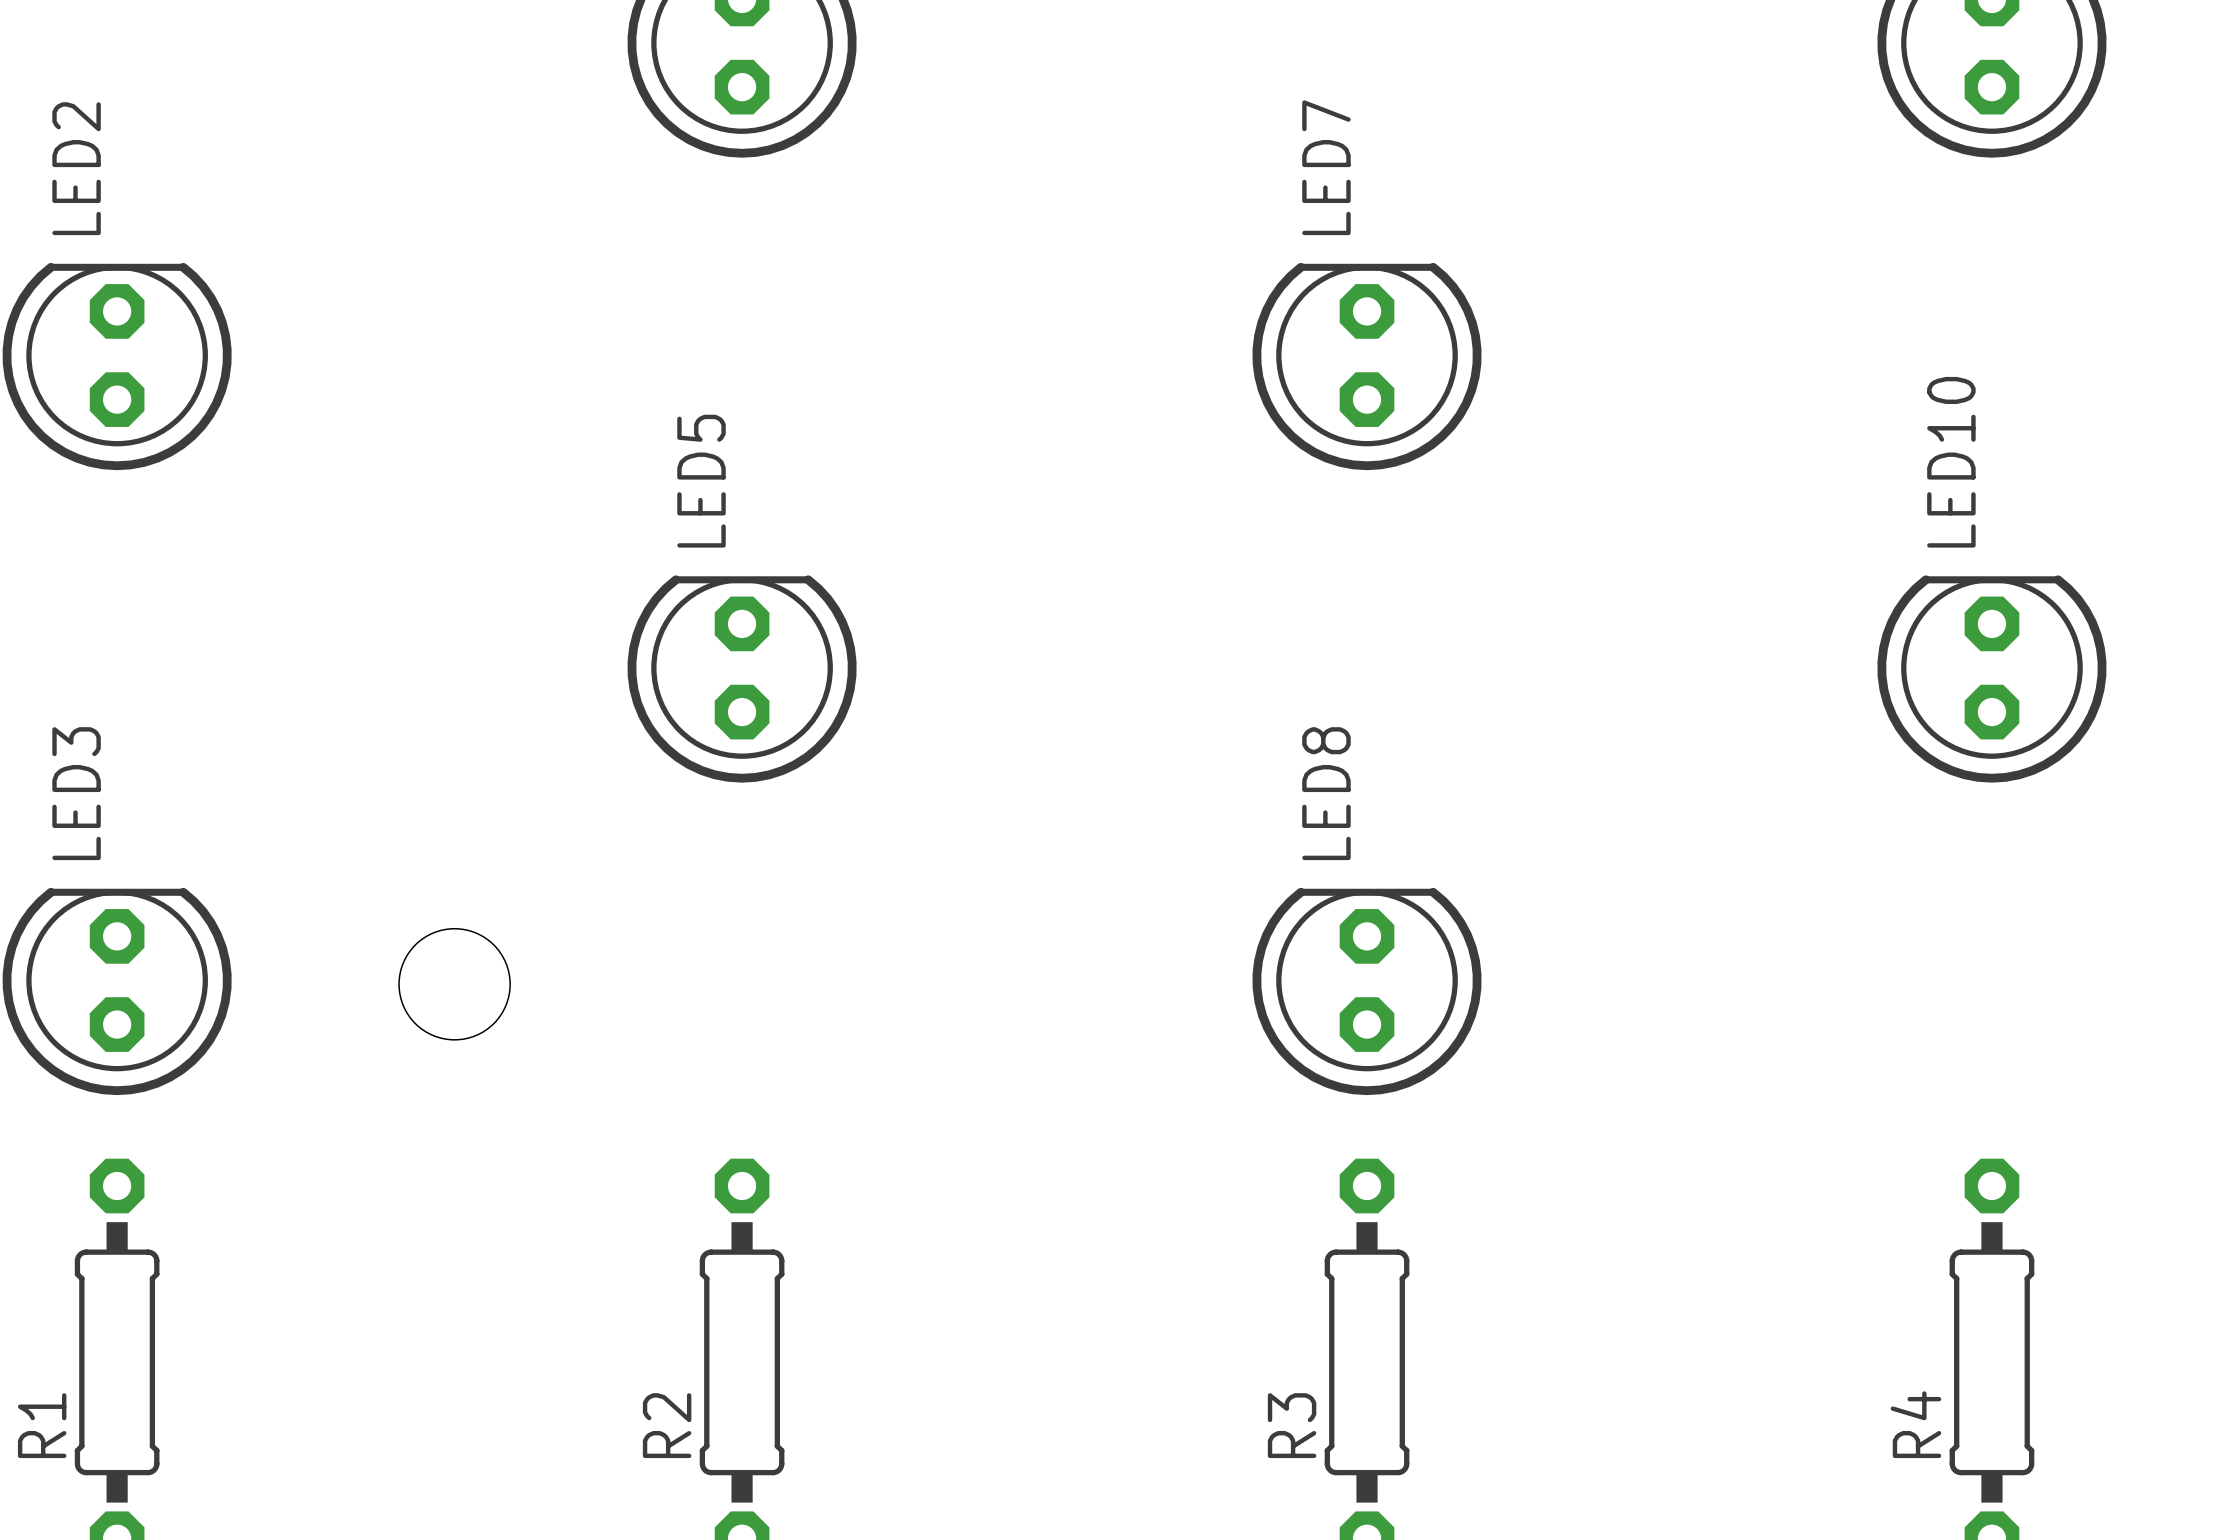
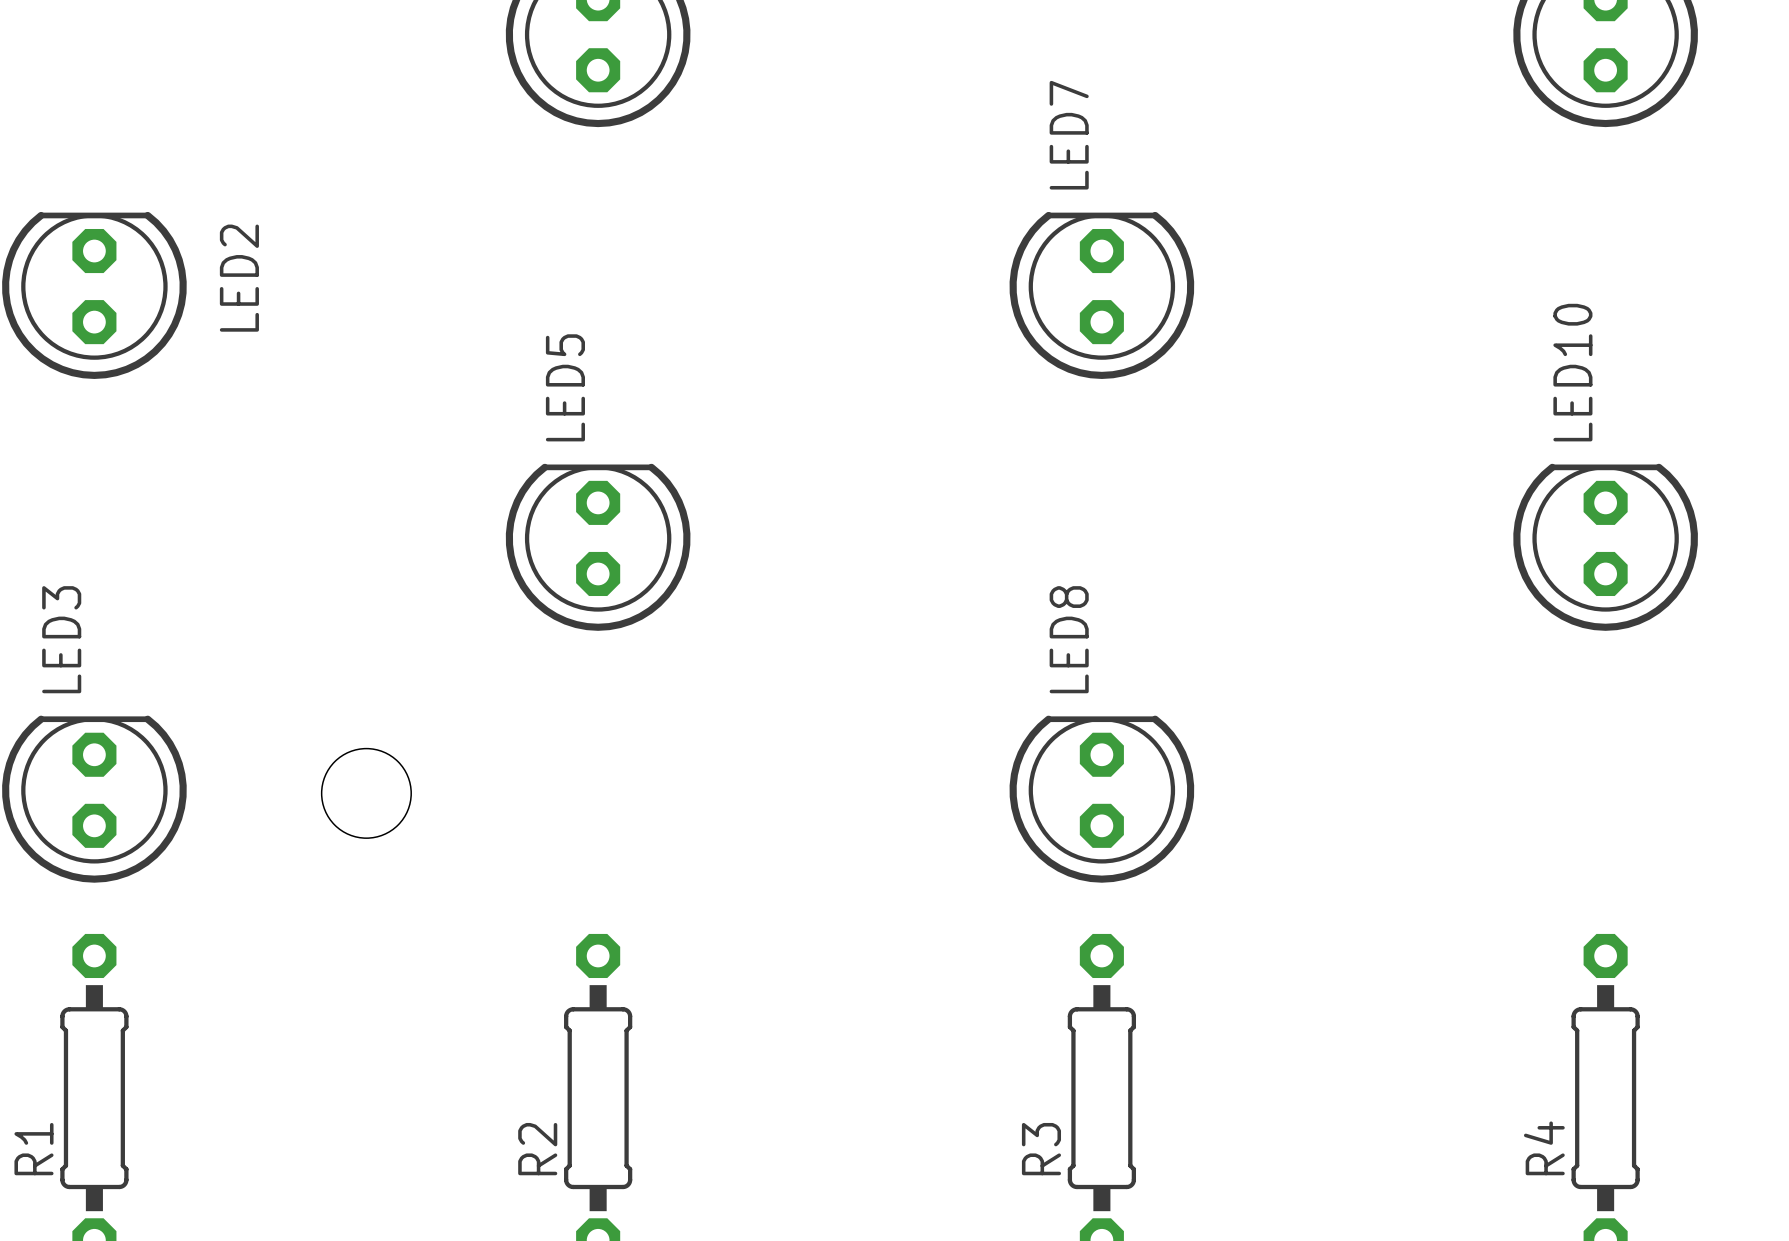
LED2 name position: LED2 (76, 168) -> LED2 (239, 278)

